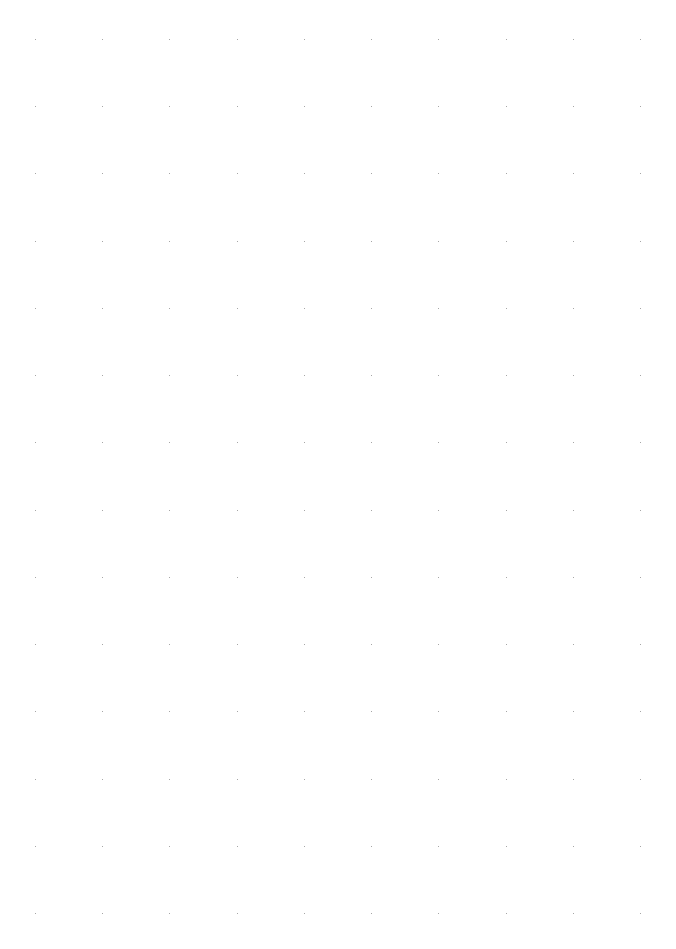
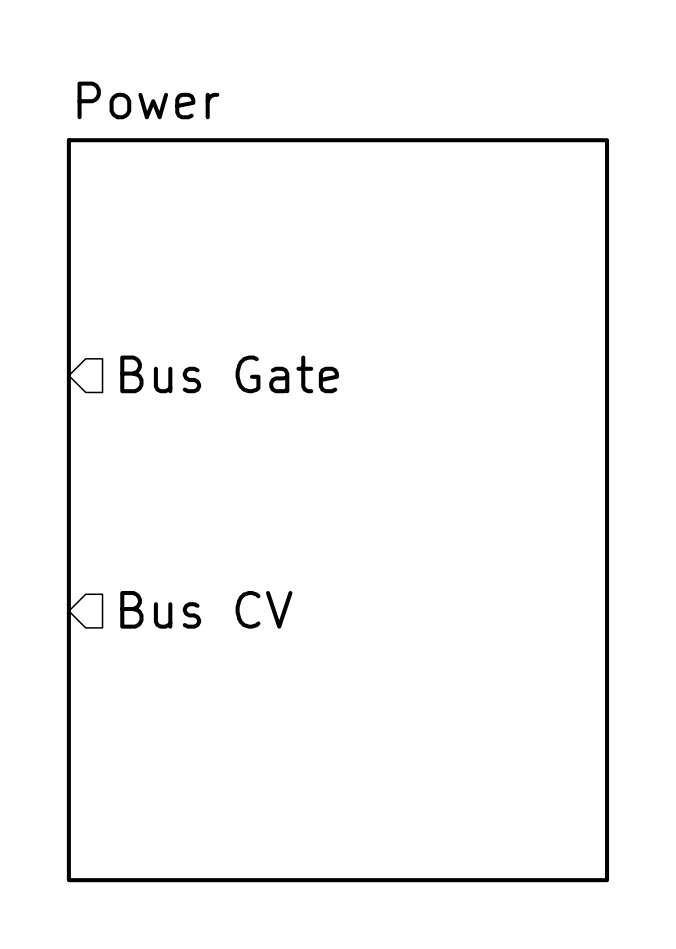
sheet pin: none -> Bus Gate (229, 374)
sheet Power: none -> (337, 510)
sheet pin: none -> Bus CV (206, 609)

